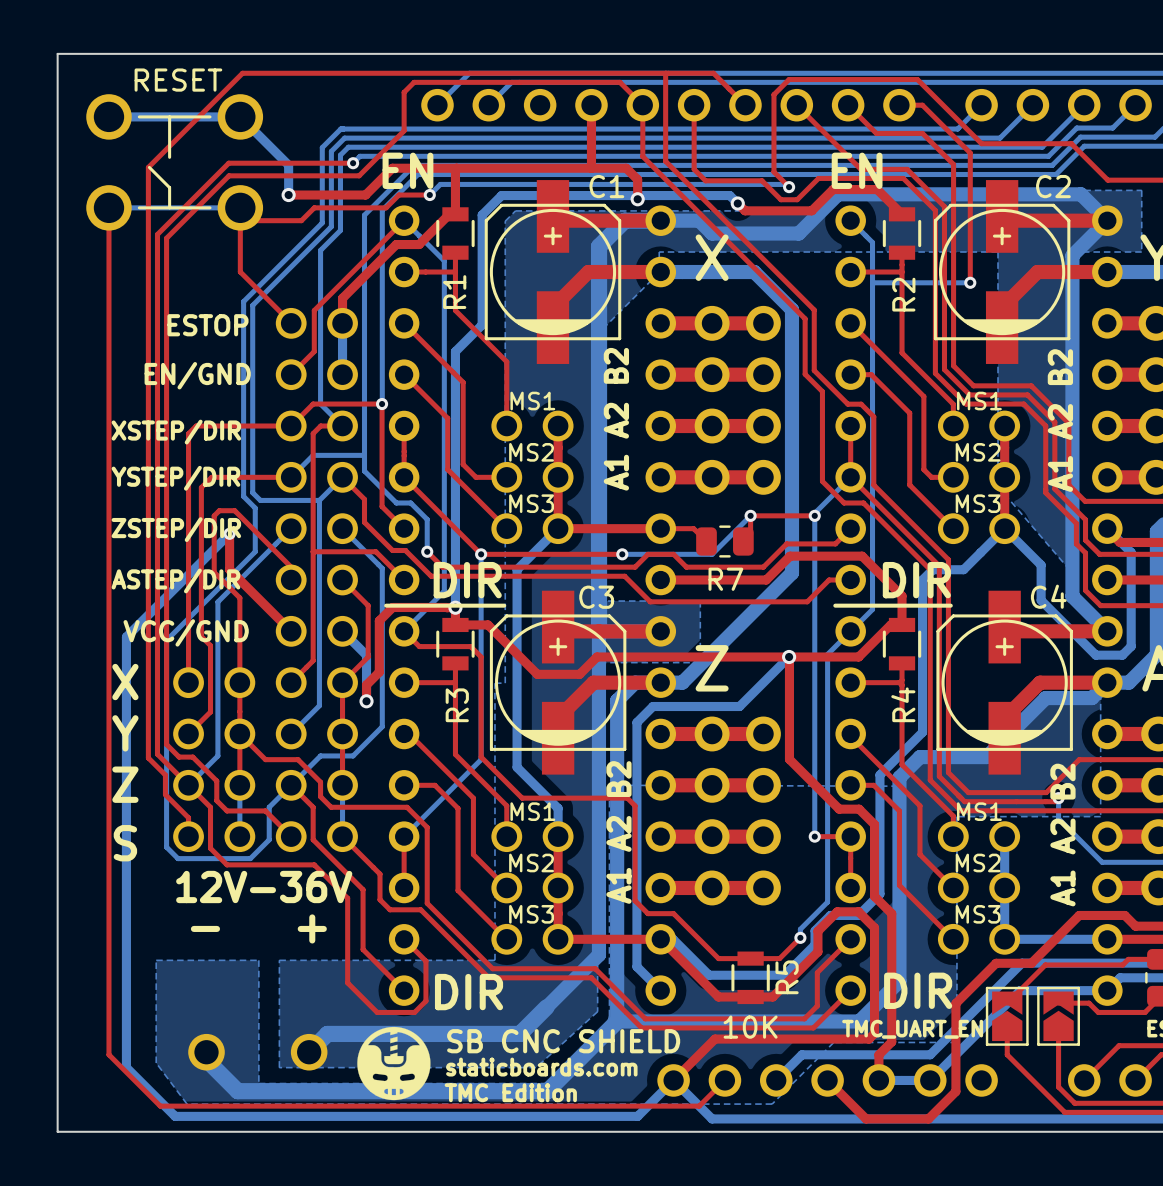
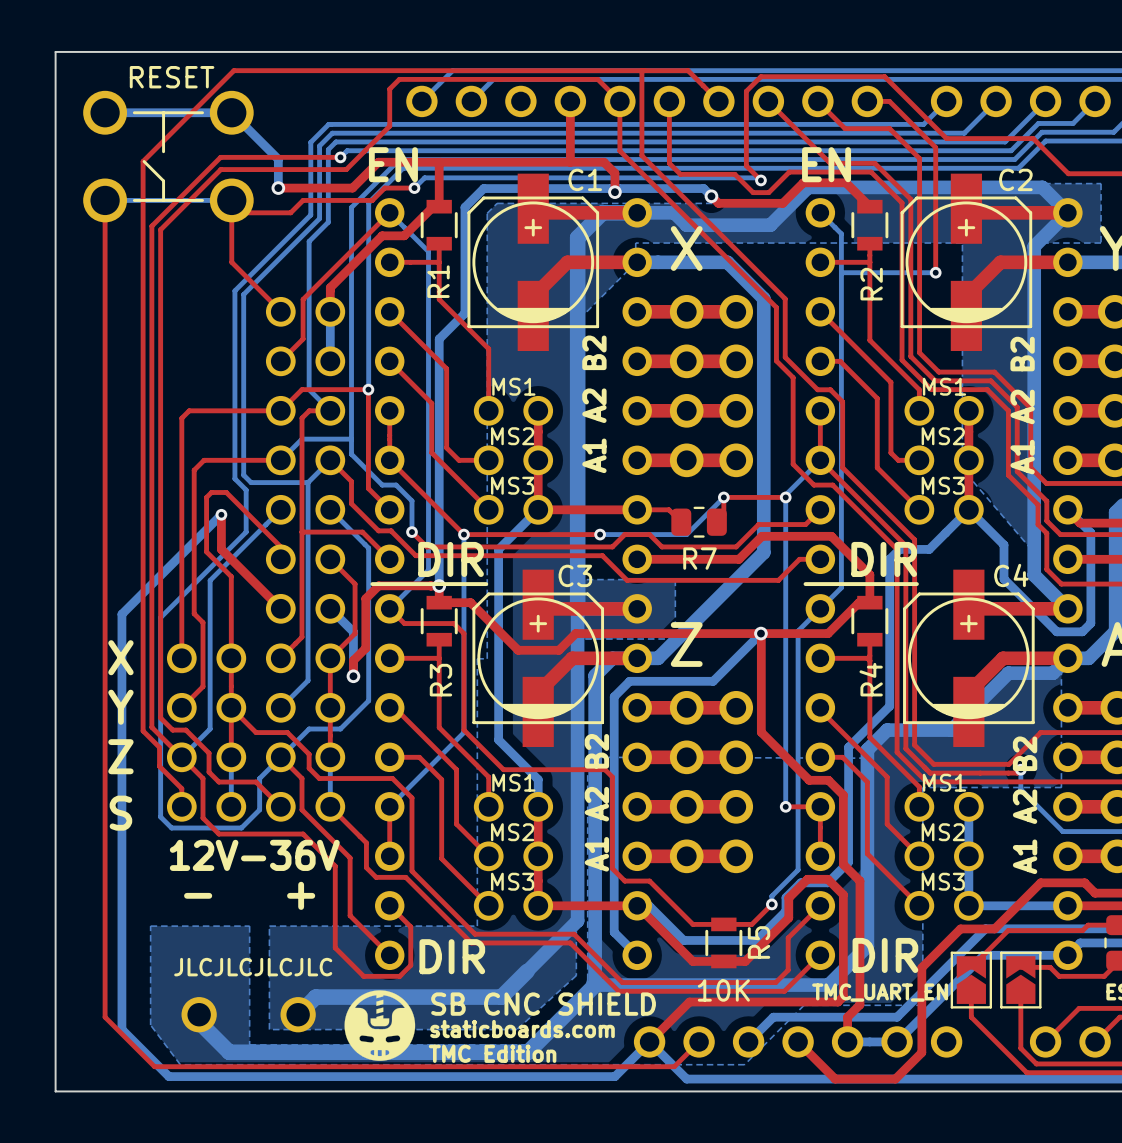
part value: ESTOP (207, 325) -> none
part value: EN/GND (197, 375) -> none
part value: XSTEP/DIR (176, 432) -> none
part value: YSTEP/DIR (175, 478) -> none
part value: ZSTEP/DIR (176, 529) -> none
part value: ASTEP/DIR (175, 580) -> none
part value: VCC/GND (186, 632) -> none
text: none -> JLCJLCJLCJLC (253, 967)

